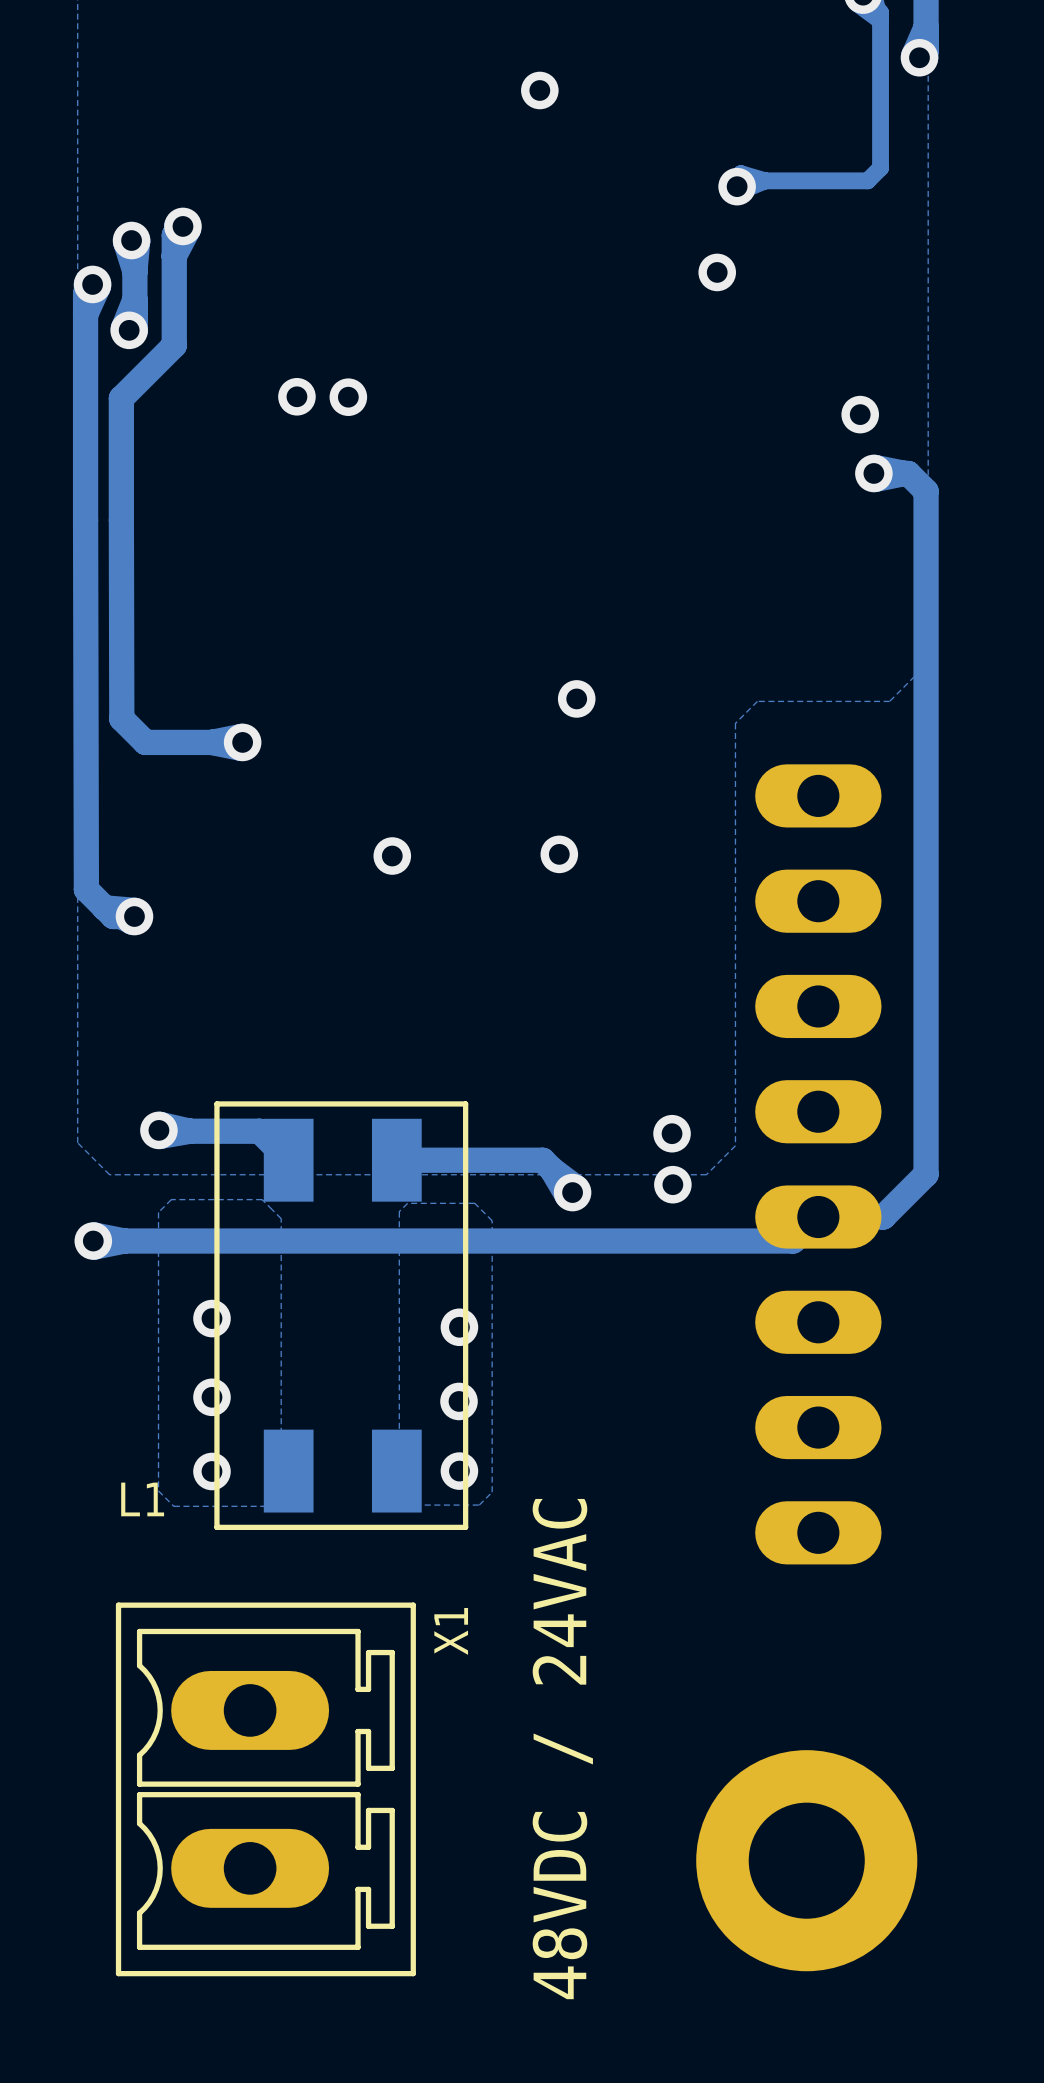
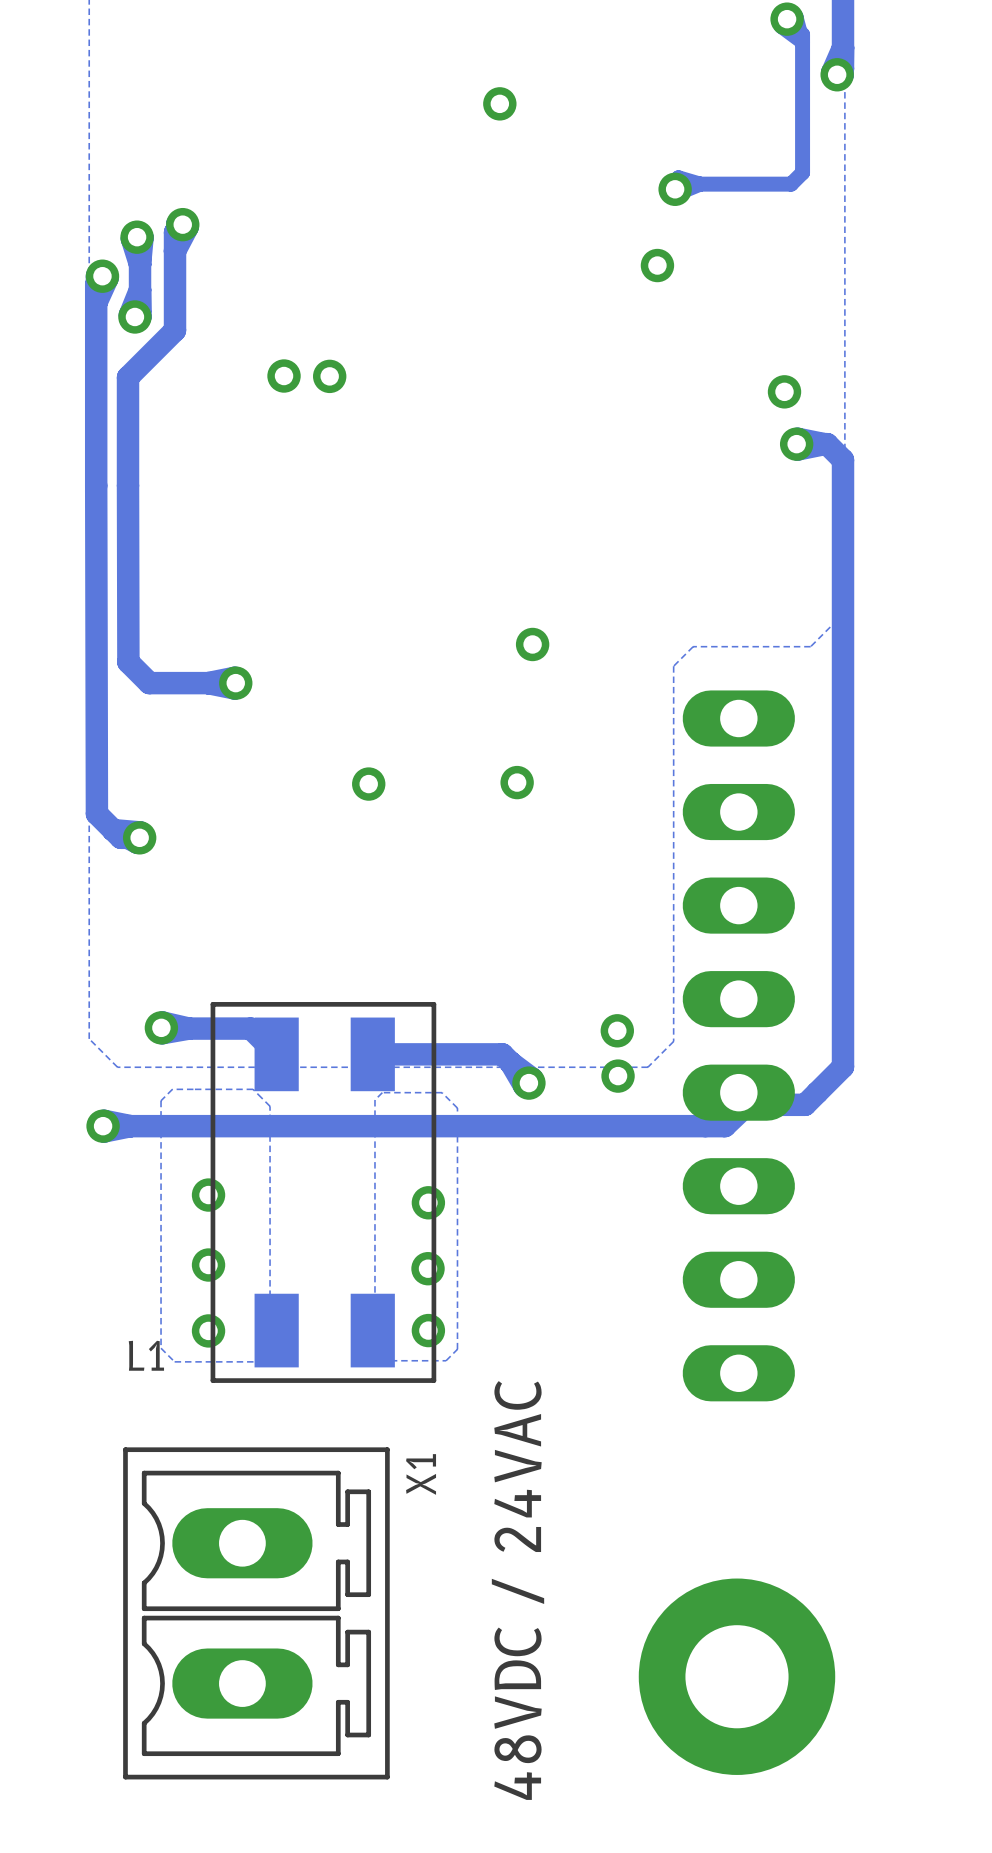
part position: (818, 1164) -> (738, 1045)

